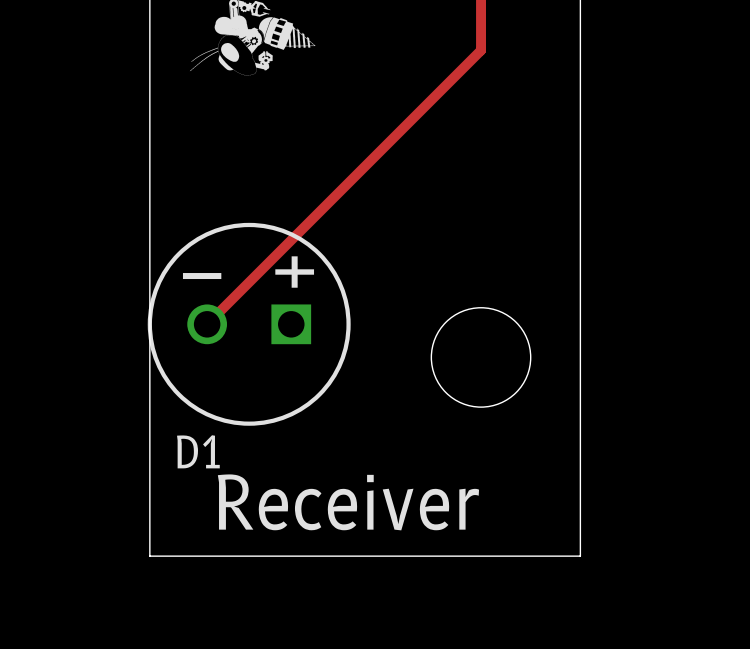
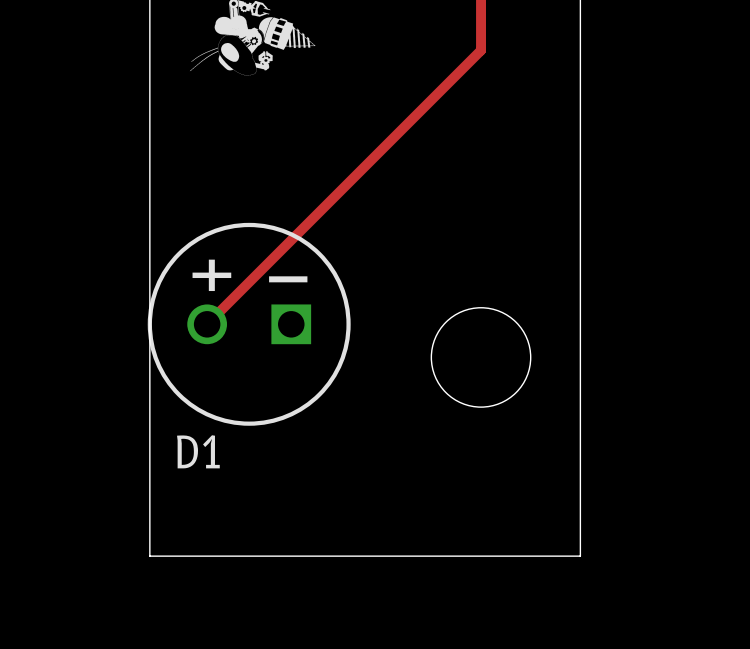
text position: + (294, 272) -> + (211, 275)
text position: _ (202, 276) -> _ (288, 279)
text: Receiver (348, 502) -> none

